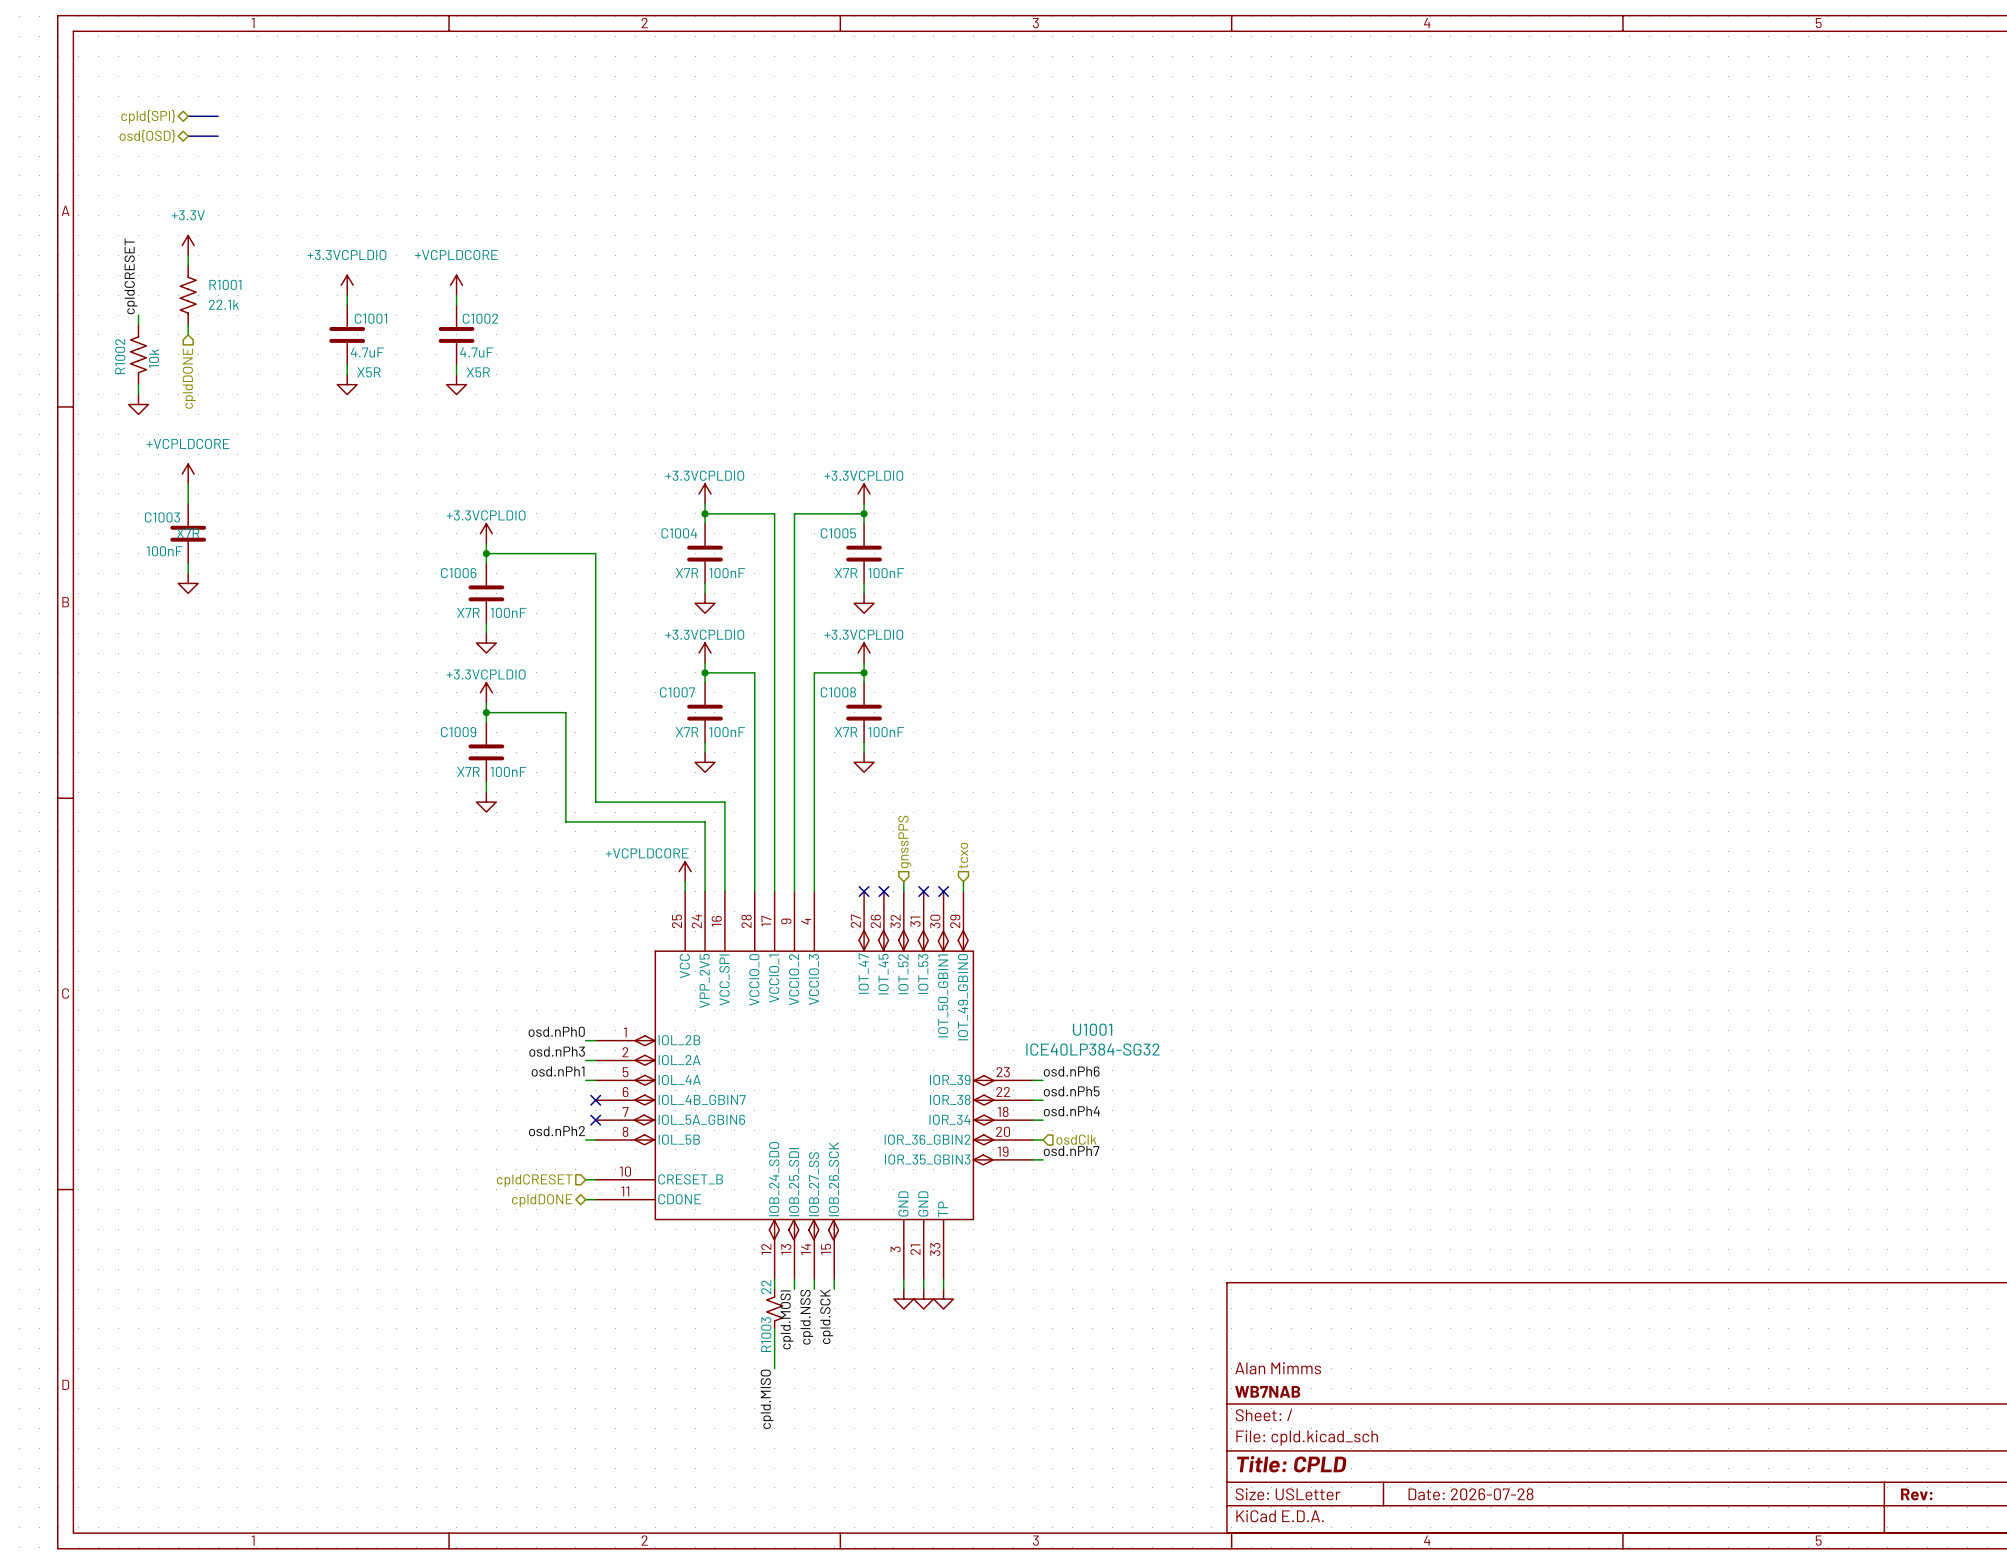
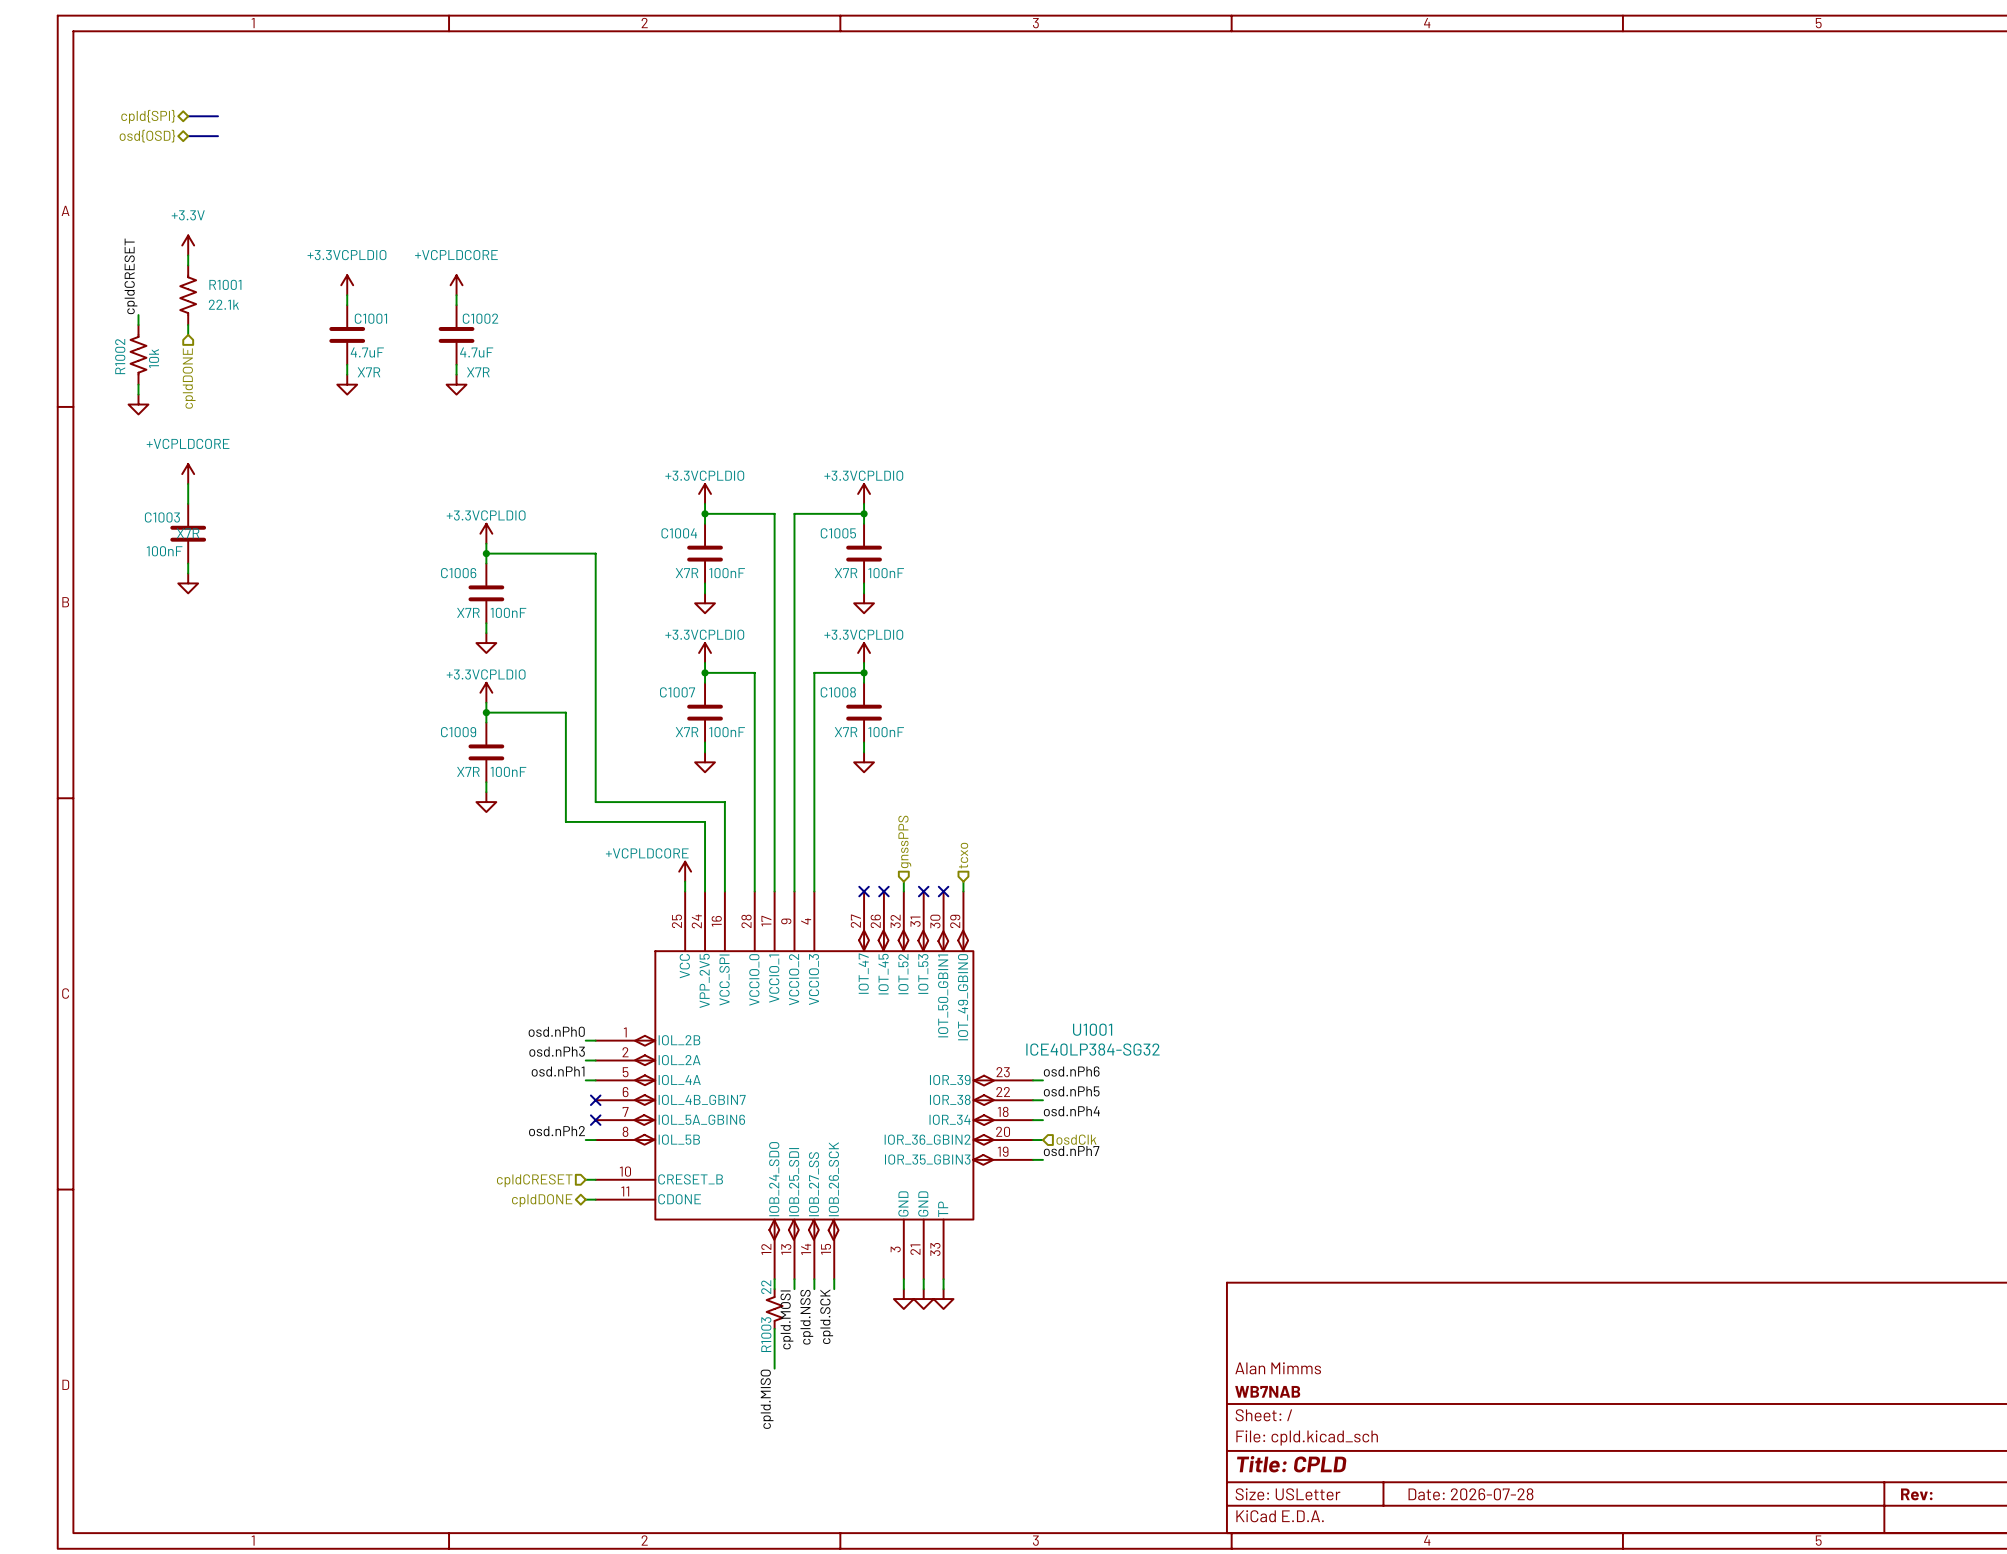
C1001 text: X5R (369, 372) -> X7R (369, 372)
C1002 text: X5R (478, 372) -> X7R (478, 372)

